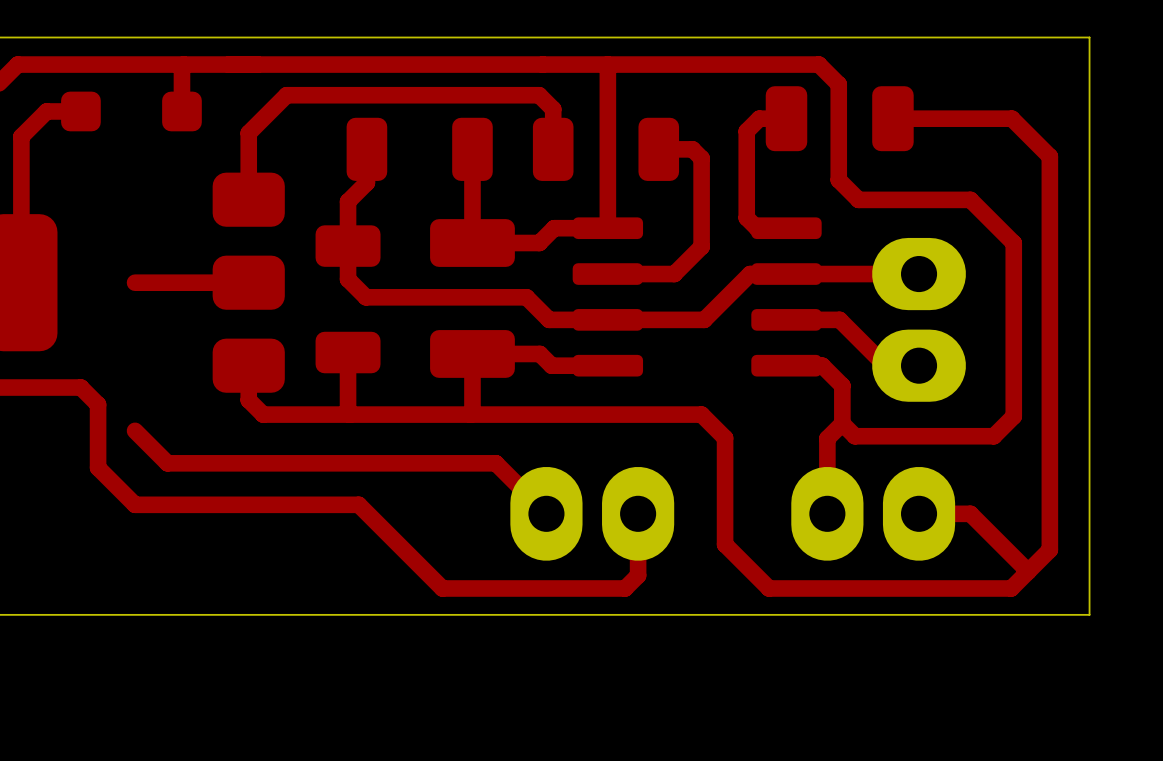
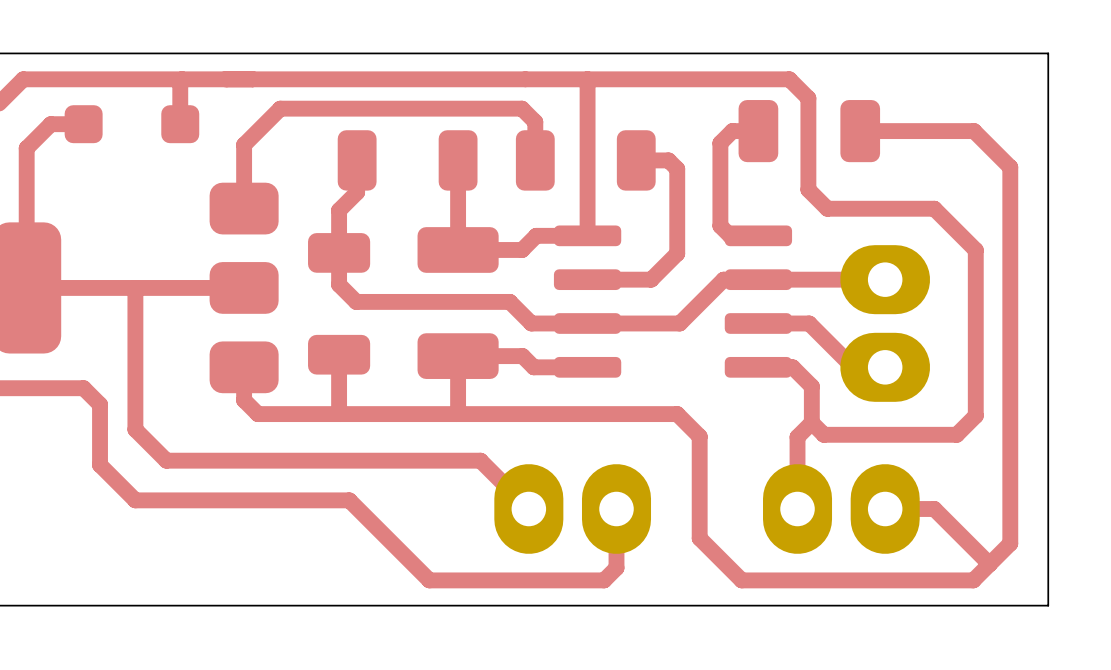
top track: none -> (26, 287) (135, 287) (135, 429)

